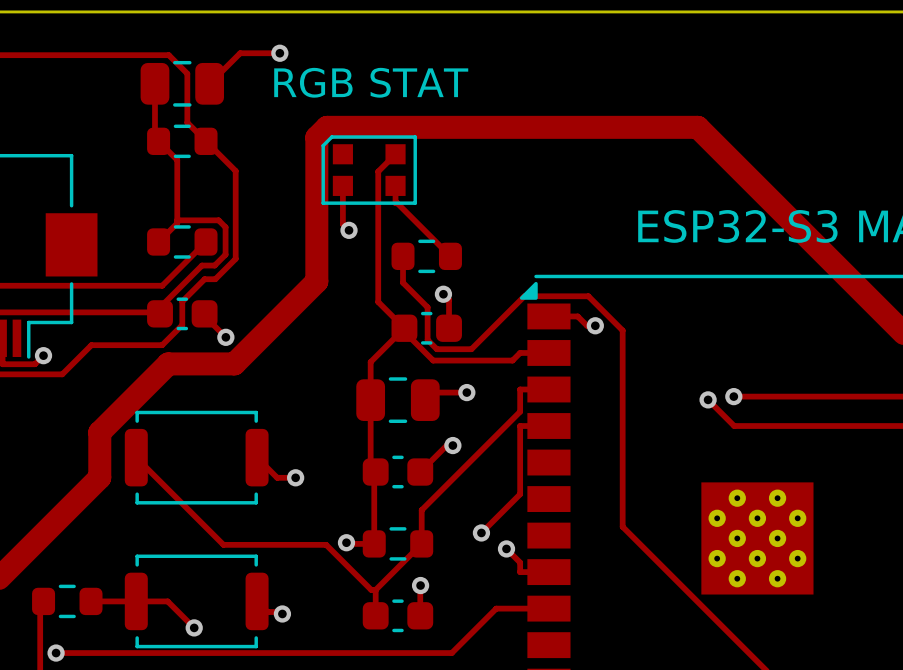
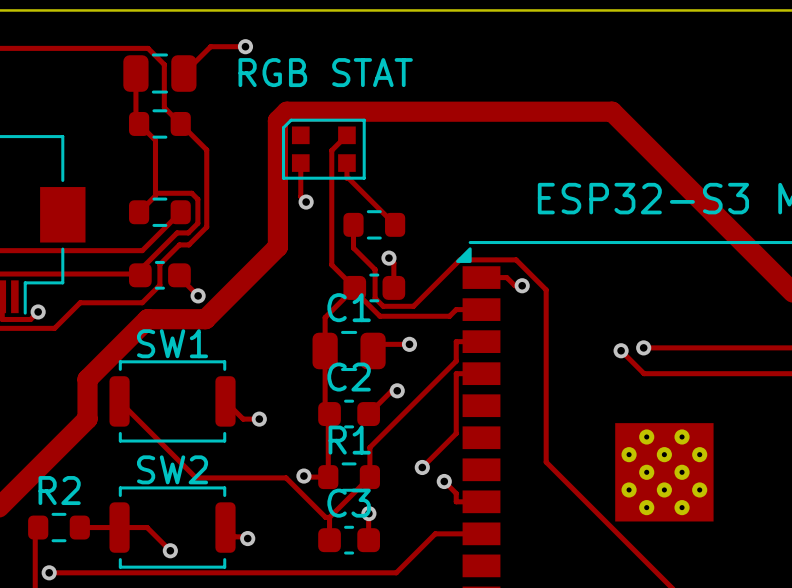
C1 name: none -> C1 (349, 307)
SW1 name: none -> SW1 (172, 343)
C2 name: none -> C2 (349, 377)
R1 name: none -> R1 (349, 440)
SW2 name: none -> SW2 (172, 469)
R2 name: none -> R2 (59, 490)
C3 name: none -> C3 (349, 503)

